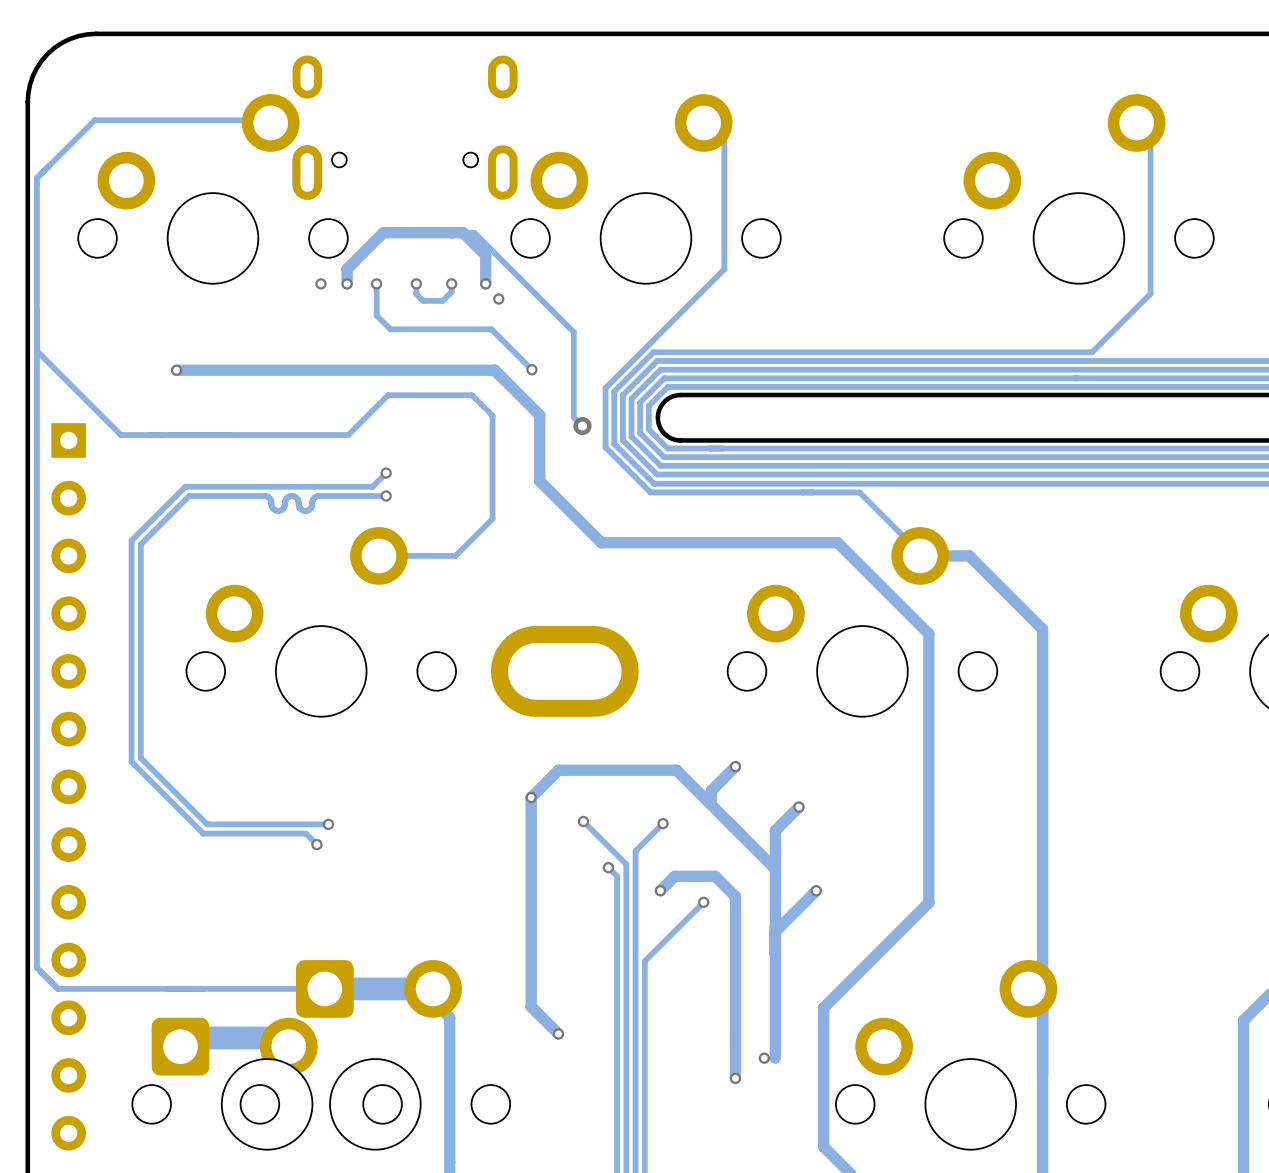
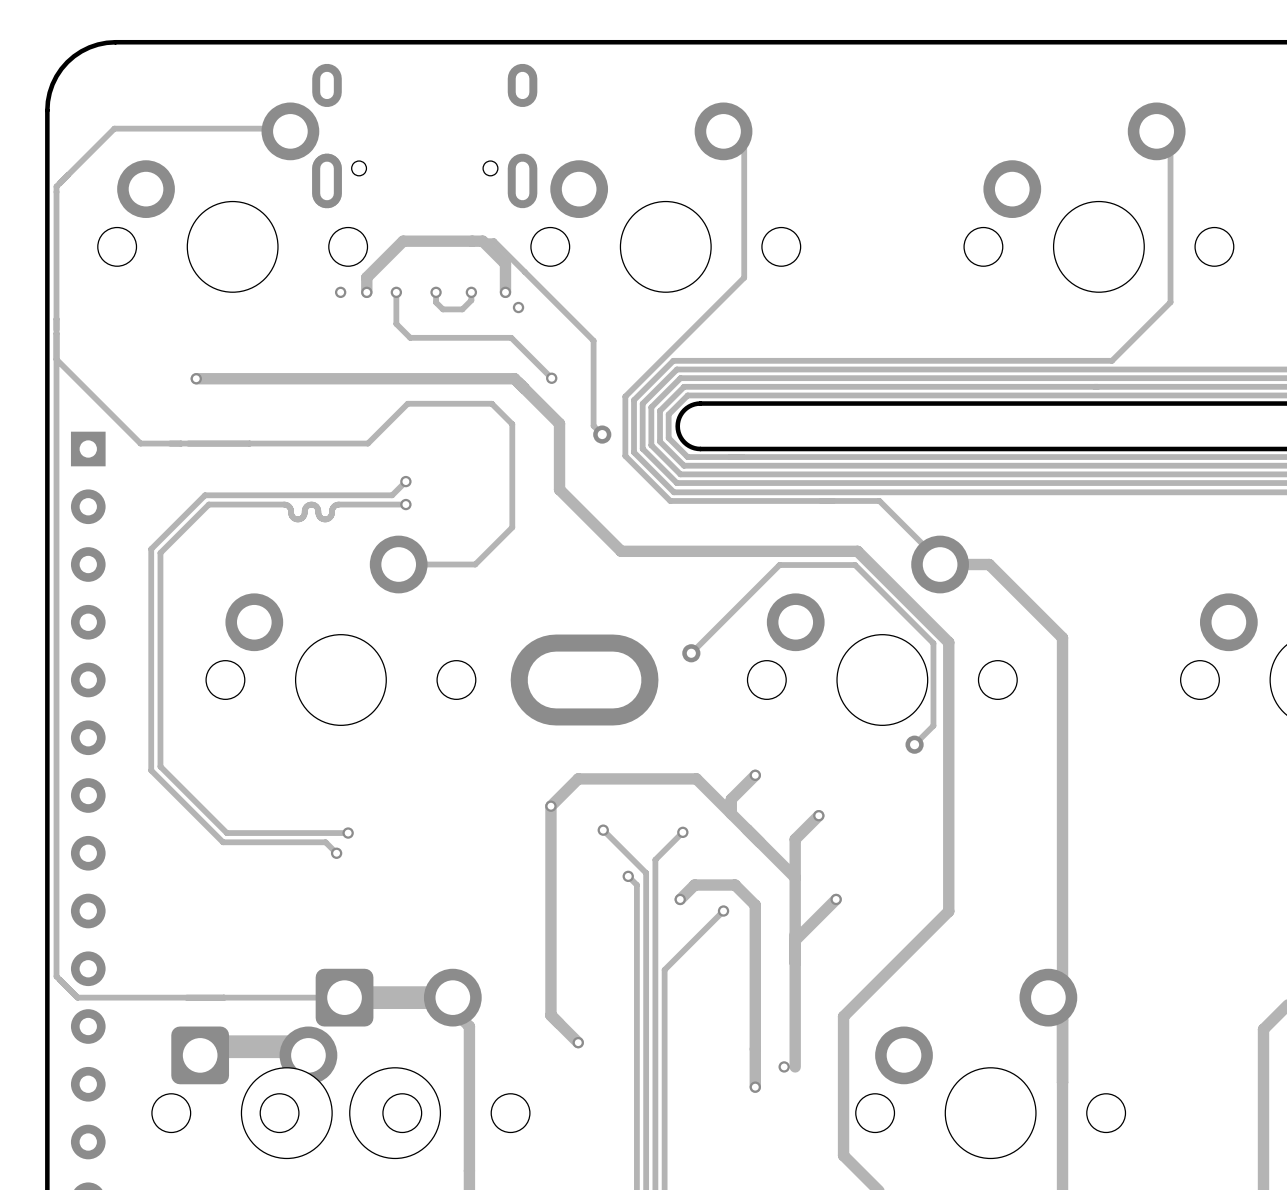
track: none -> (691, 653) (779, 565) (855, 565) (933, 643) (933, 725) (914, 744)
via: none -> (691, 653)
via: none -> (914, 744)

